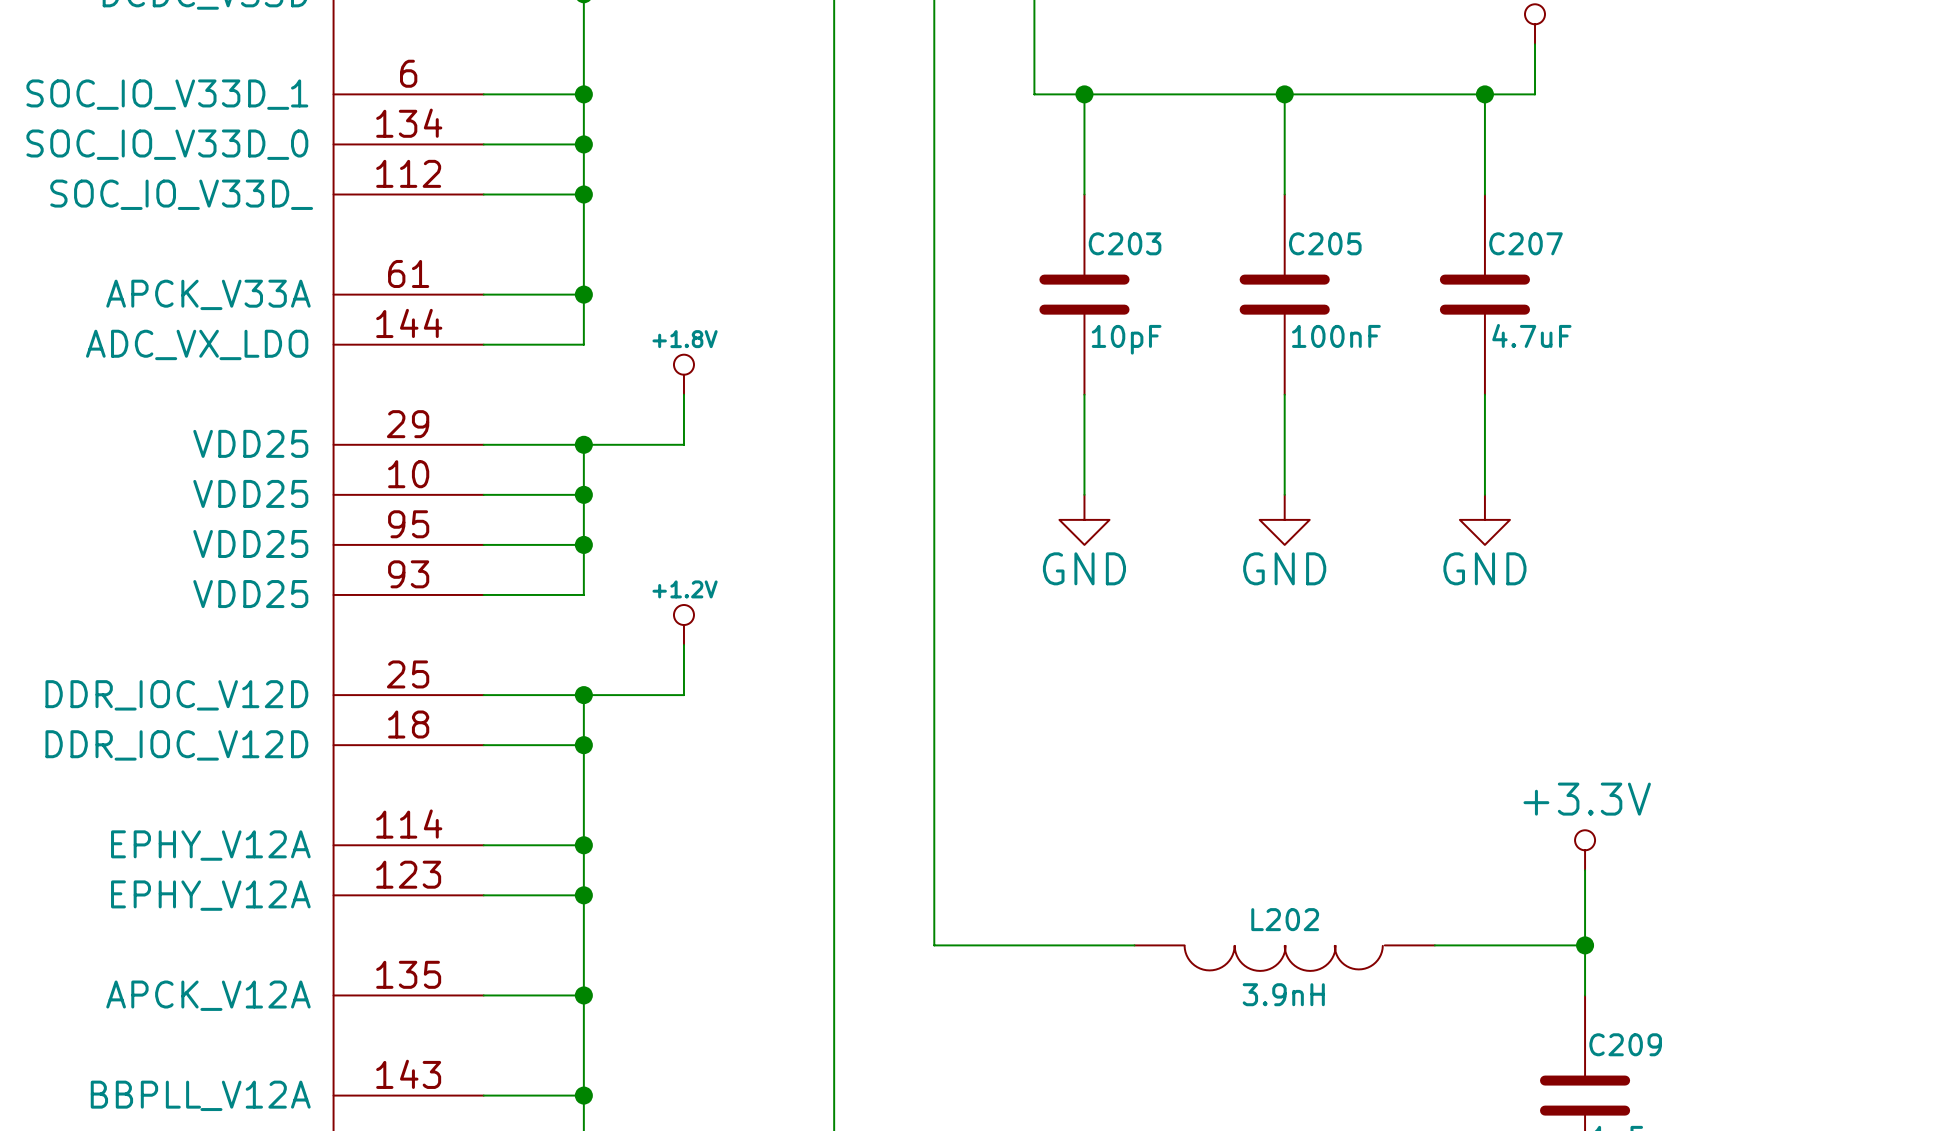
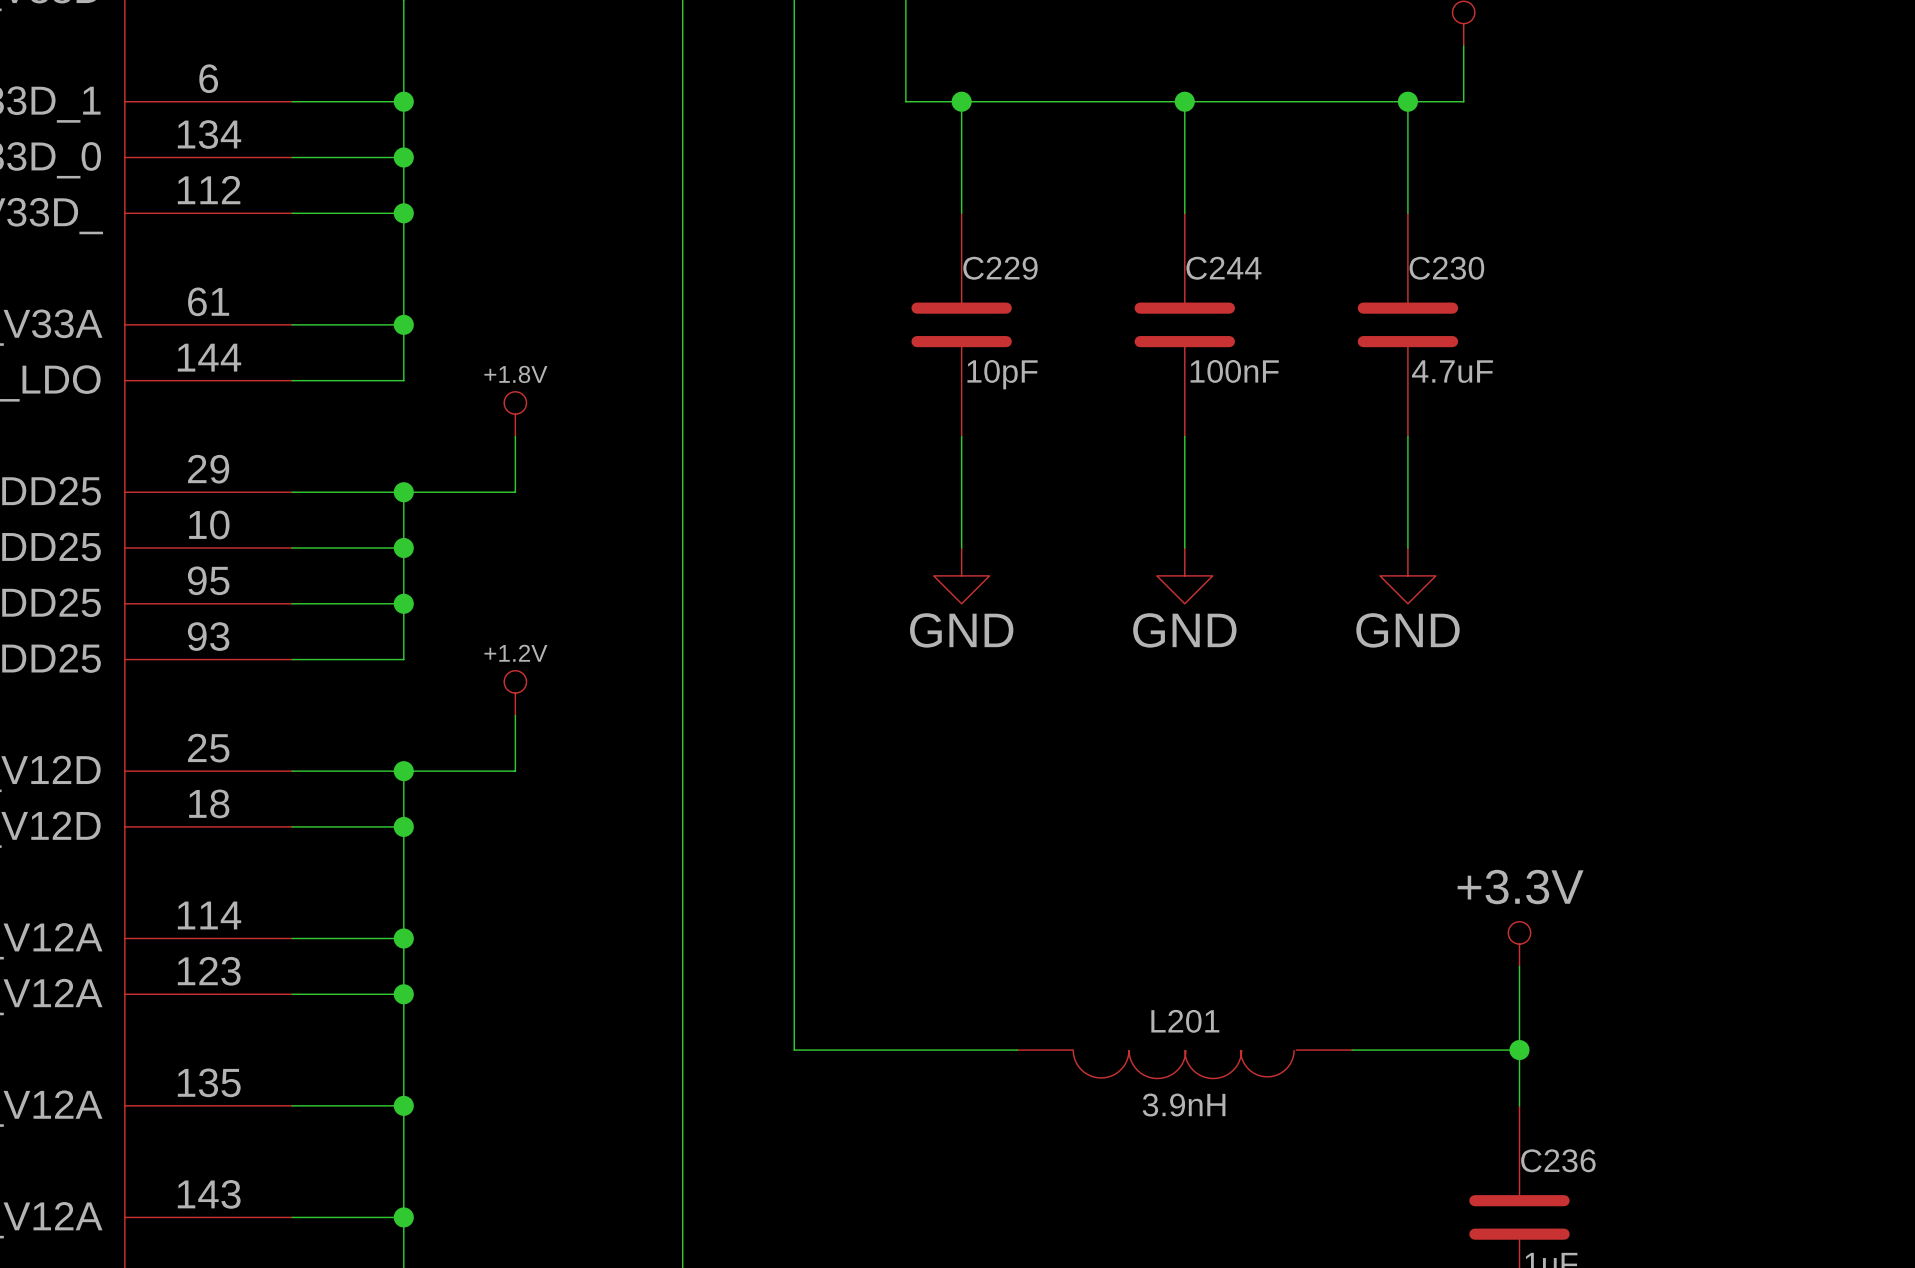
C203 name: C203 (1125, 243) -> C229 (1000, 268)
C205 name: C205 (1325, 243) -> C244 (1223, 268)
C207 name: C207 (1526, 243) -> C230 (1446, 268)
L202 name: L202 (1285, 919) -> L201 (1185, 1021)
C209 name: C209 (1625, 1044) -> C236 (1558, 1160)

